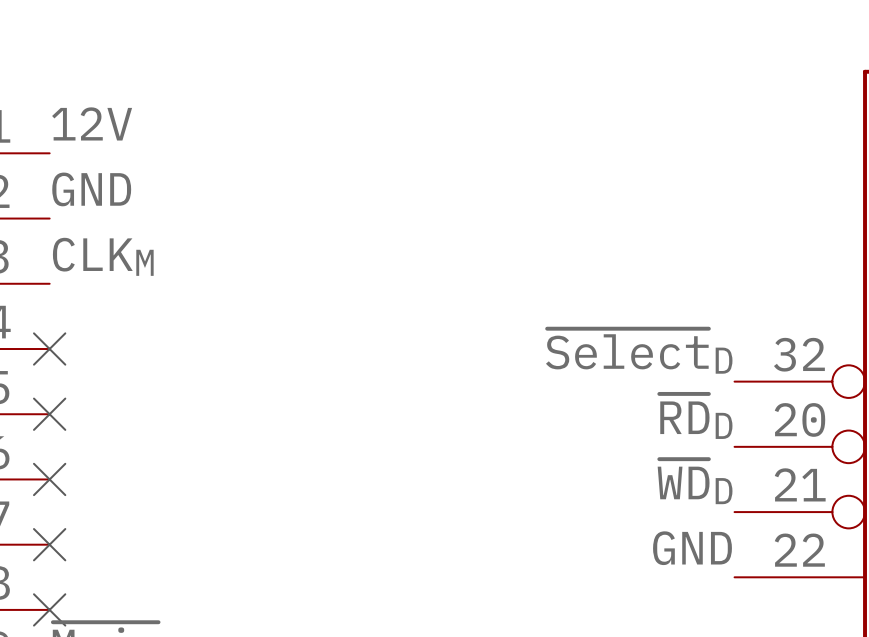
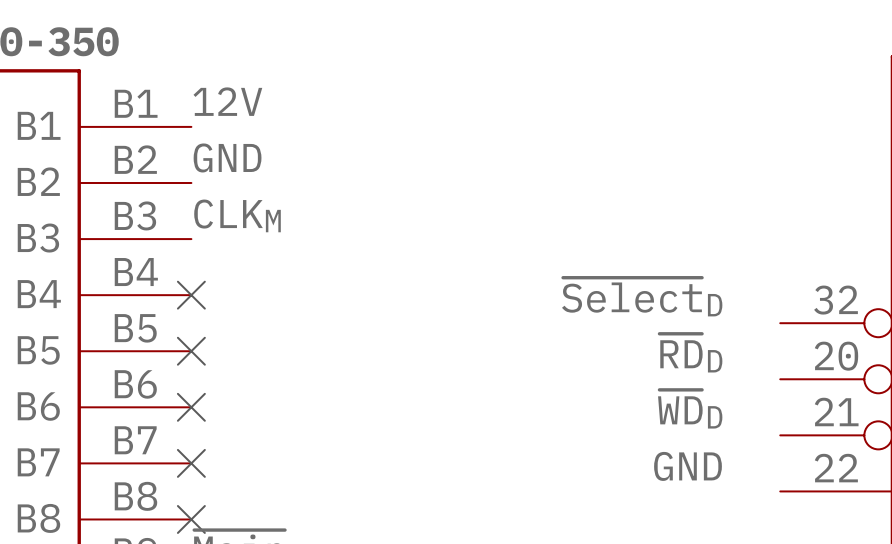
label position: ~{Select}D (639, 351) -> ~{Select}D (642, 297)
label position: ~{RD}D (695, 416) -> ~{RD}D (690, 353)
label position: ~{WD}D (695, 481) -> ~{WD}D (690, 409)
label position: GND (692, 548) -> GND (688, 466)

